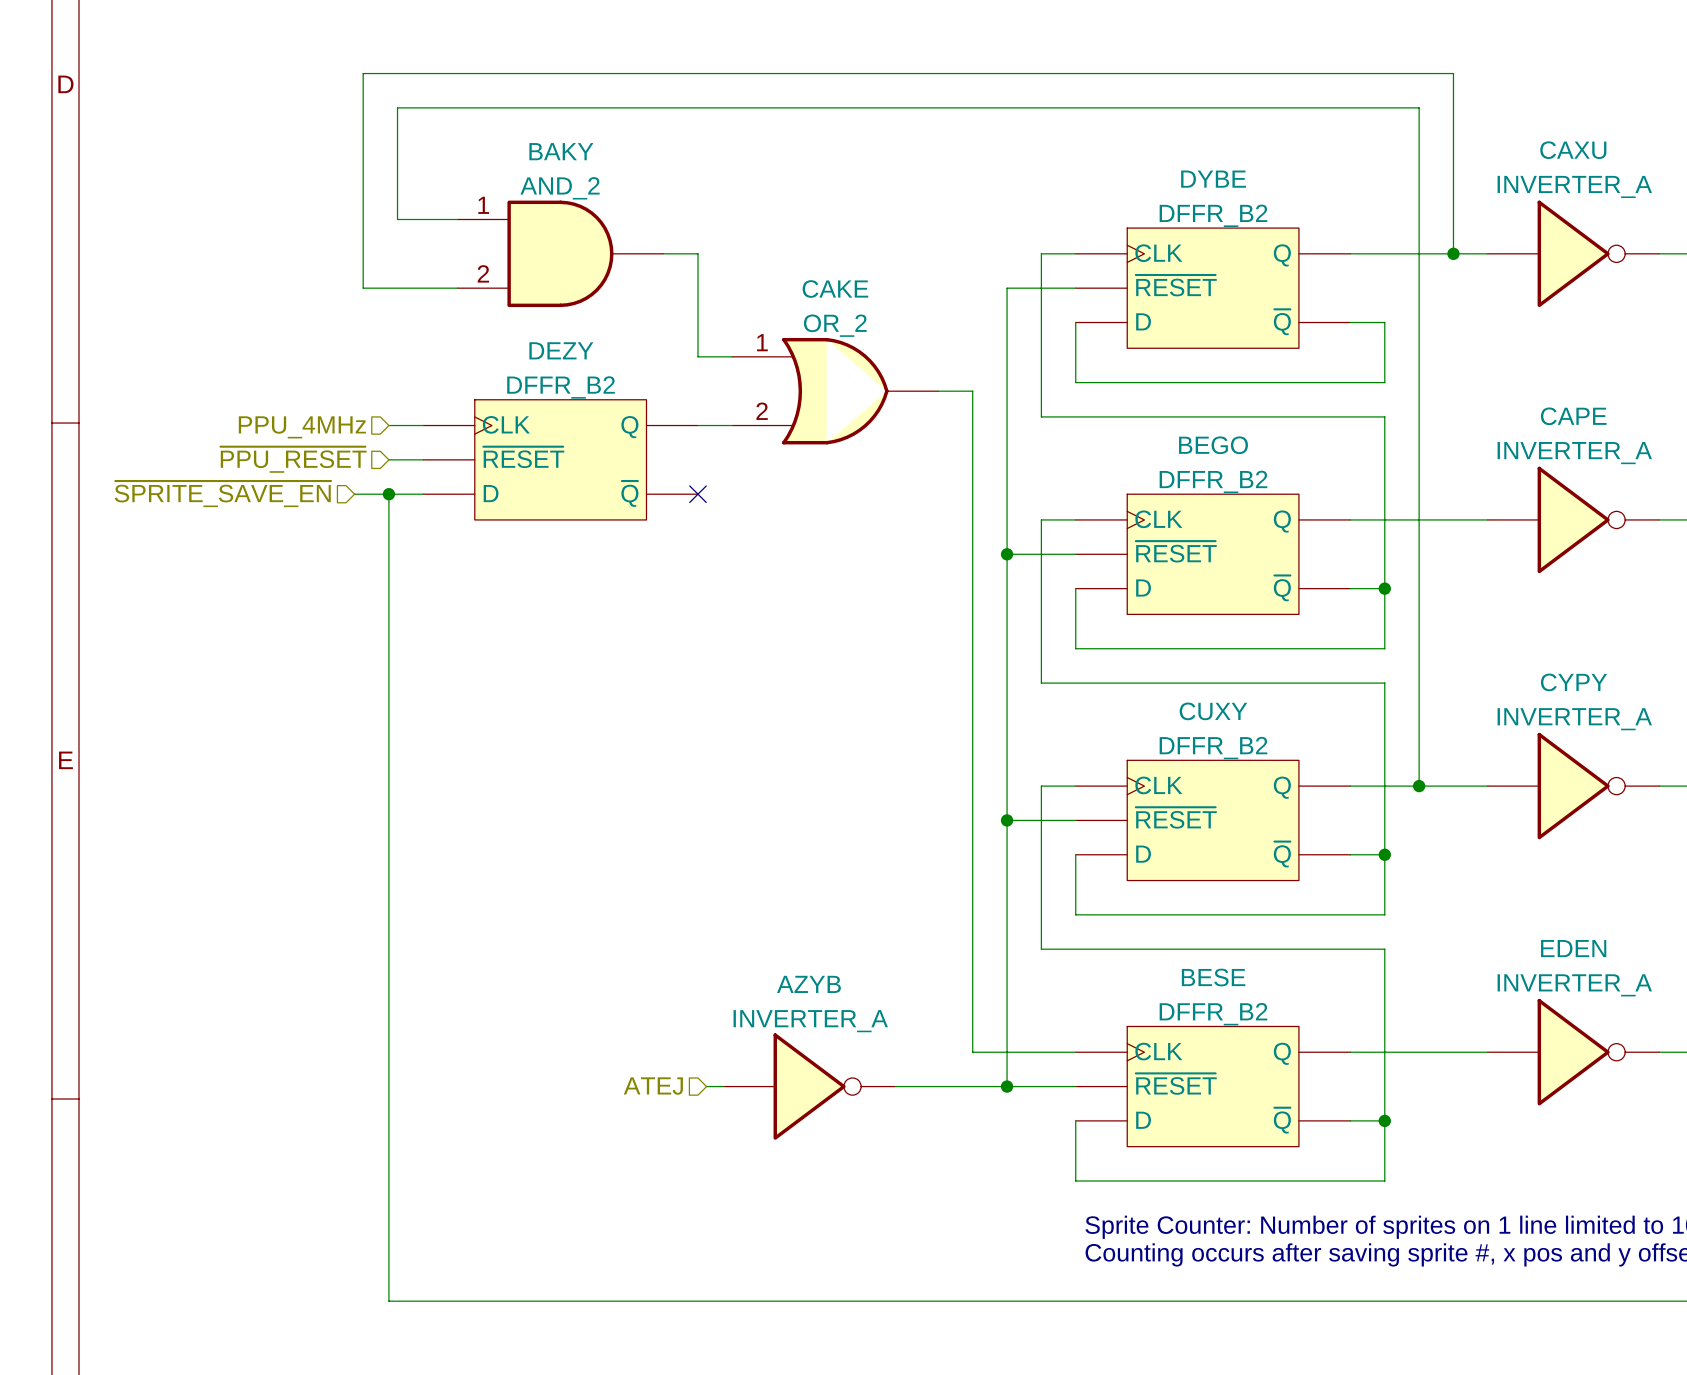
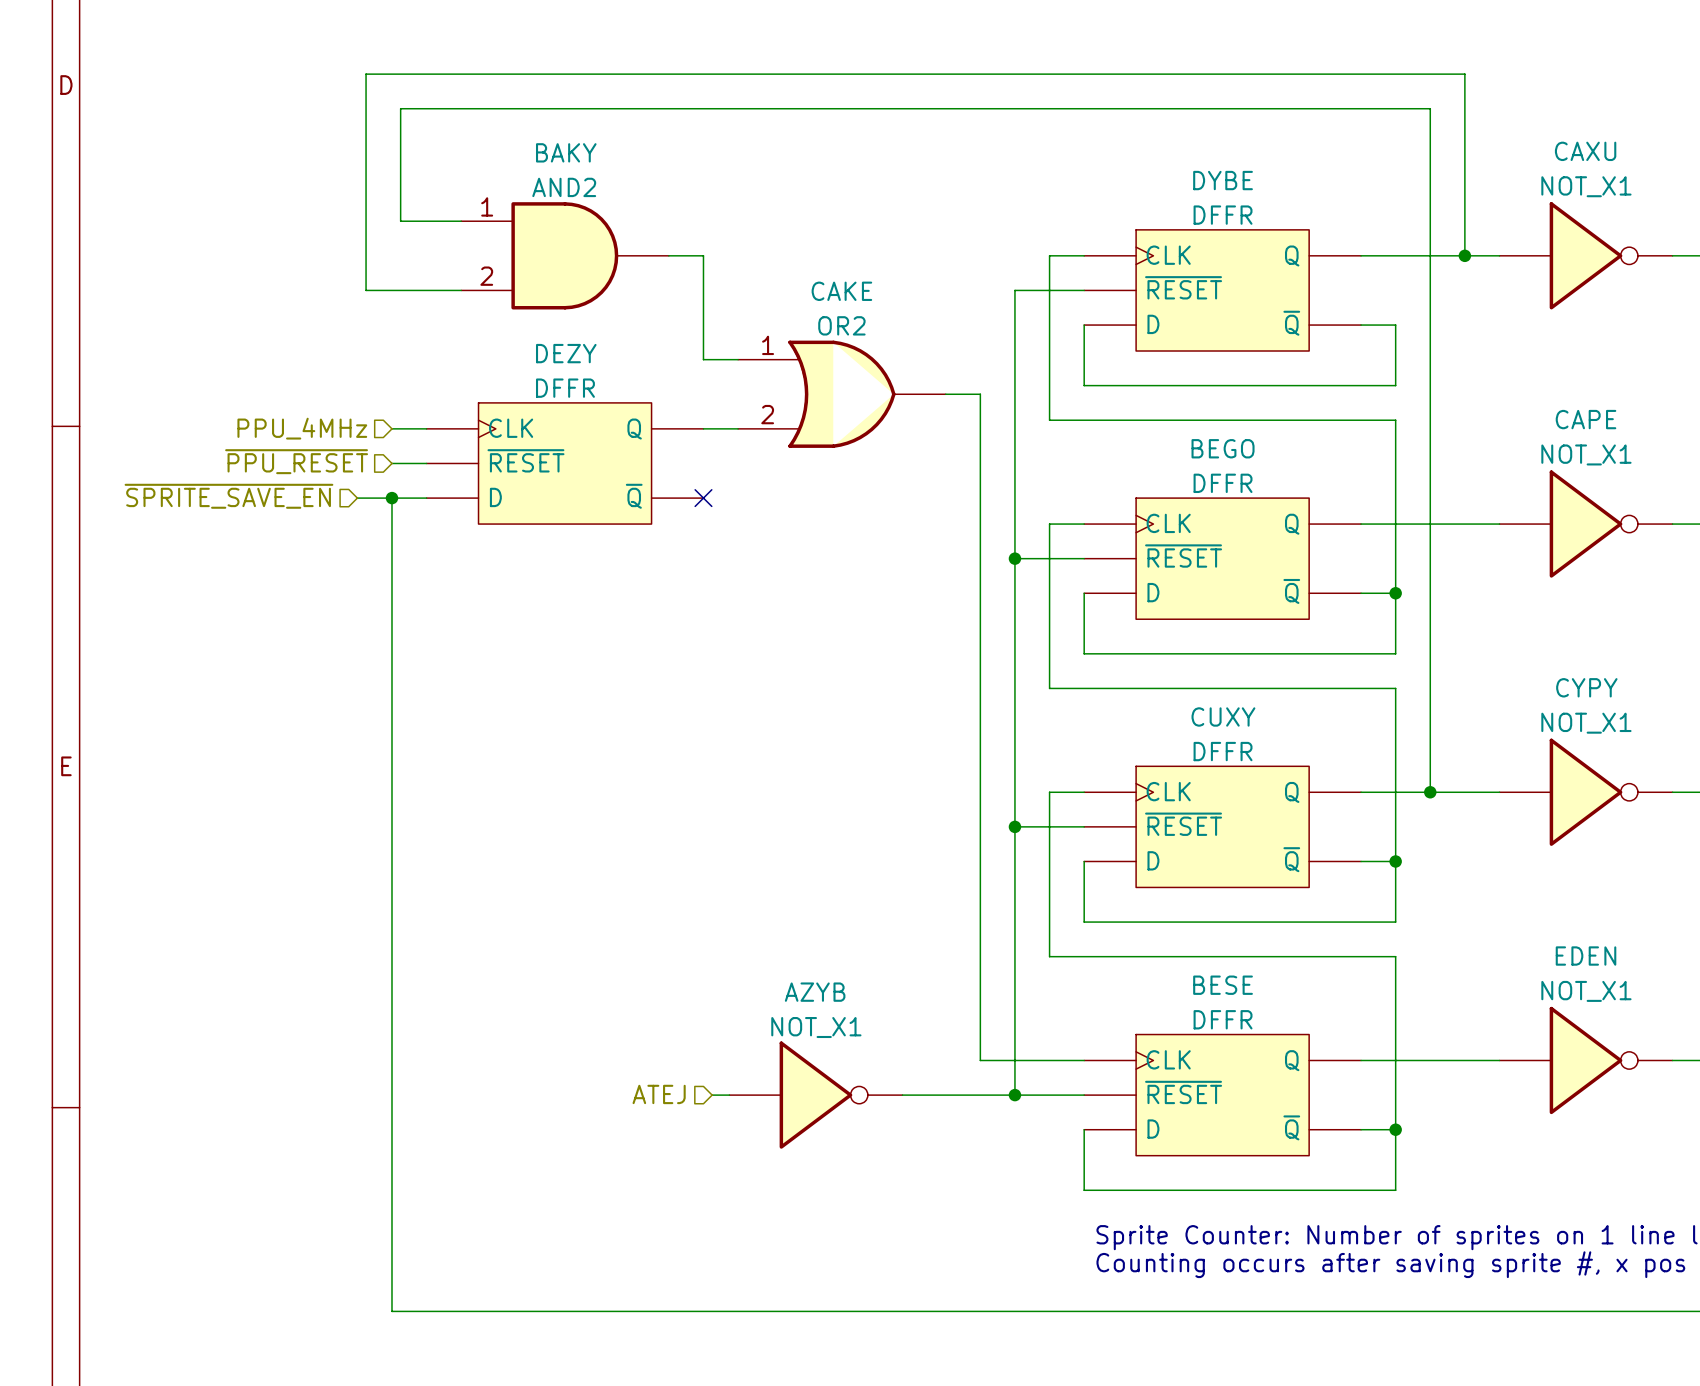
CAXU value: INVERTER_A (1574, 186) -> NOT_X1 (1586, 186)
BAKY value: AND_2 (560, 188) -> AND2 (564, 187)
DYBE value: DFFR_B2 (1213, 215) -> DFFR (1223, 215)
CAKE value: OR_2 (835, 325) -> OR2 (841, 325)
DEZY value: DFFR_B2 (561, 387) -> DFFR (565, 388)
CAPE value: INVERTER_A (1574, 453) -> NOT_X1 (1586, 454)
BEGO value: DFFR_B2 (1213, 481) -> DFFR (1223, 483)
CYPY value: INVERTER_A (1574, 719) -> NOT_X1 (1586, 723)
CUXY value: DFFR_B2 (1213, 748) -> DFFR (1223, 751)
EDEN value: INVERTER_A (1574, 985) -> NOT_X1 (1586, 991)
BESE value: DFFR_B2 (1213, 1014) -> DFFR (1223, 1019)
AZYB value: INVERTER_A (810, 1021) -> NOT_X1 (816, 1027)

